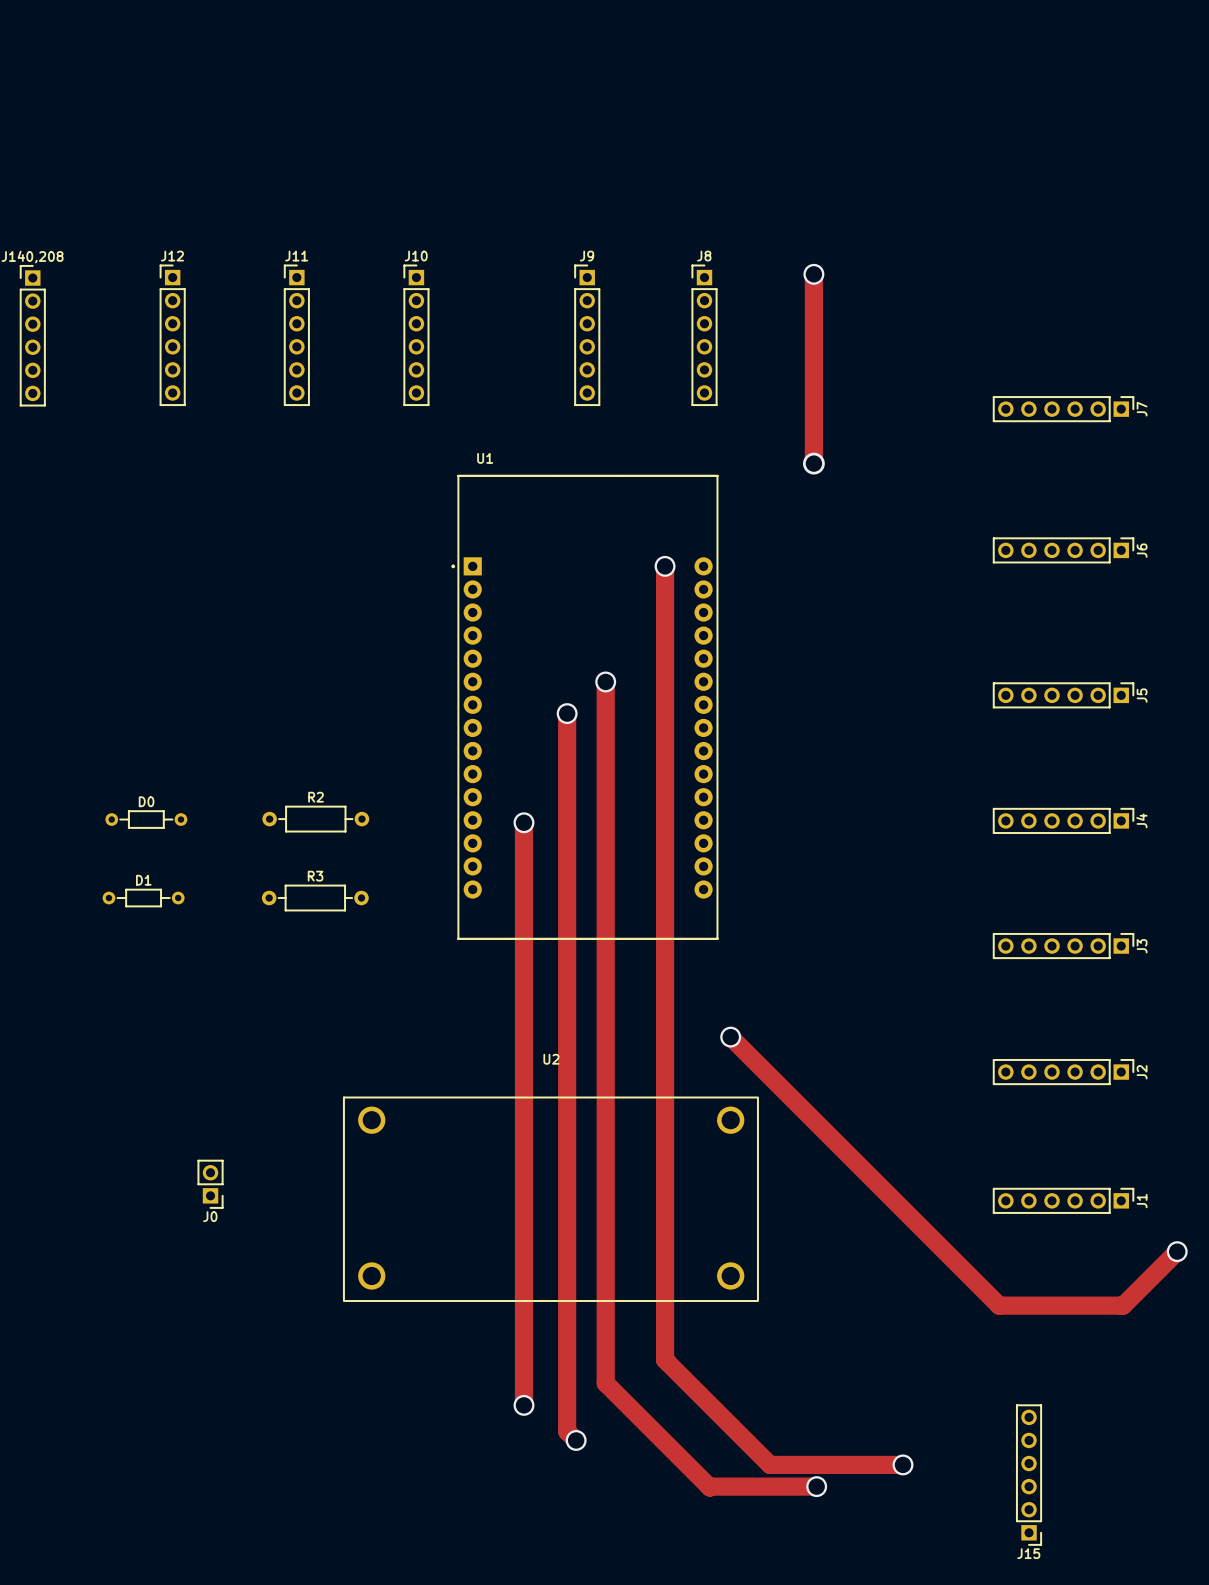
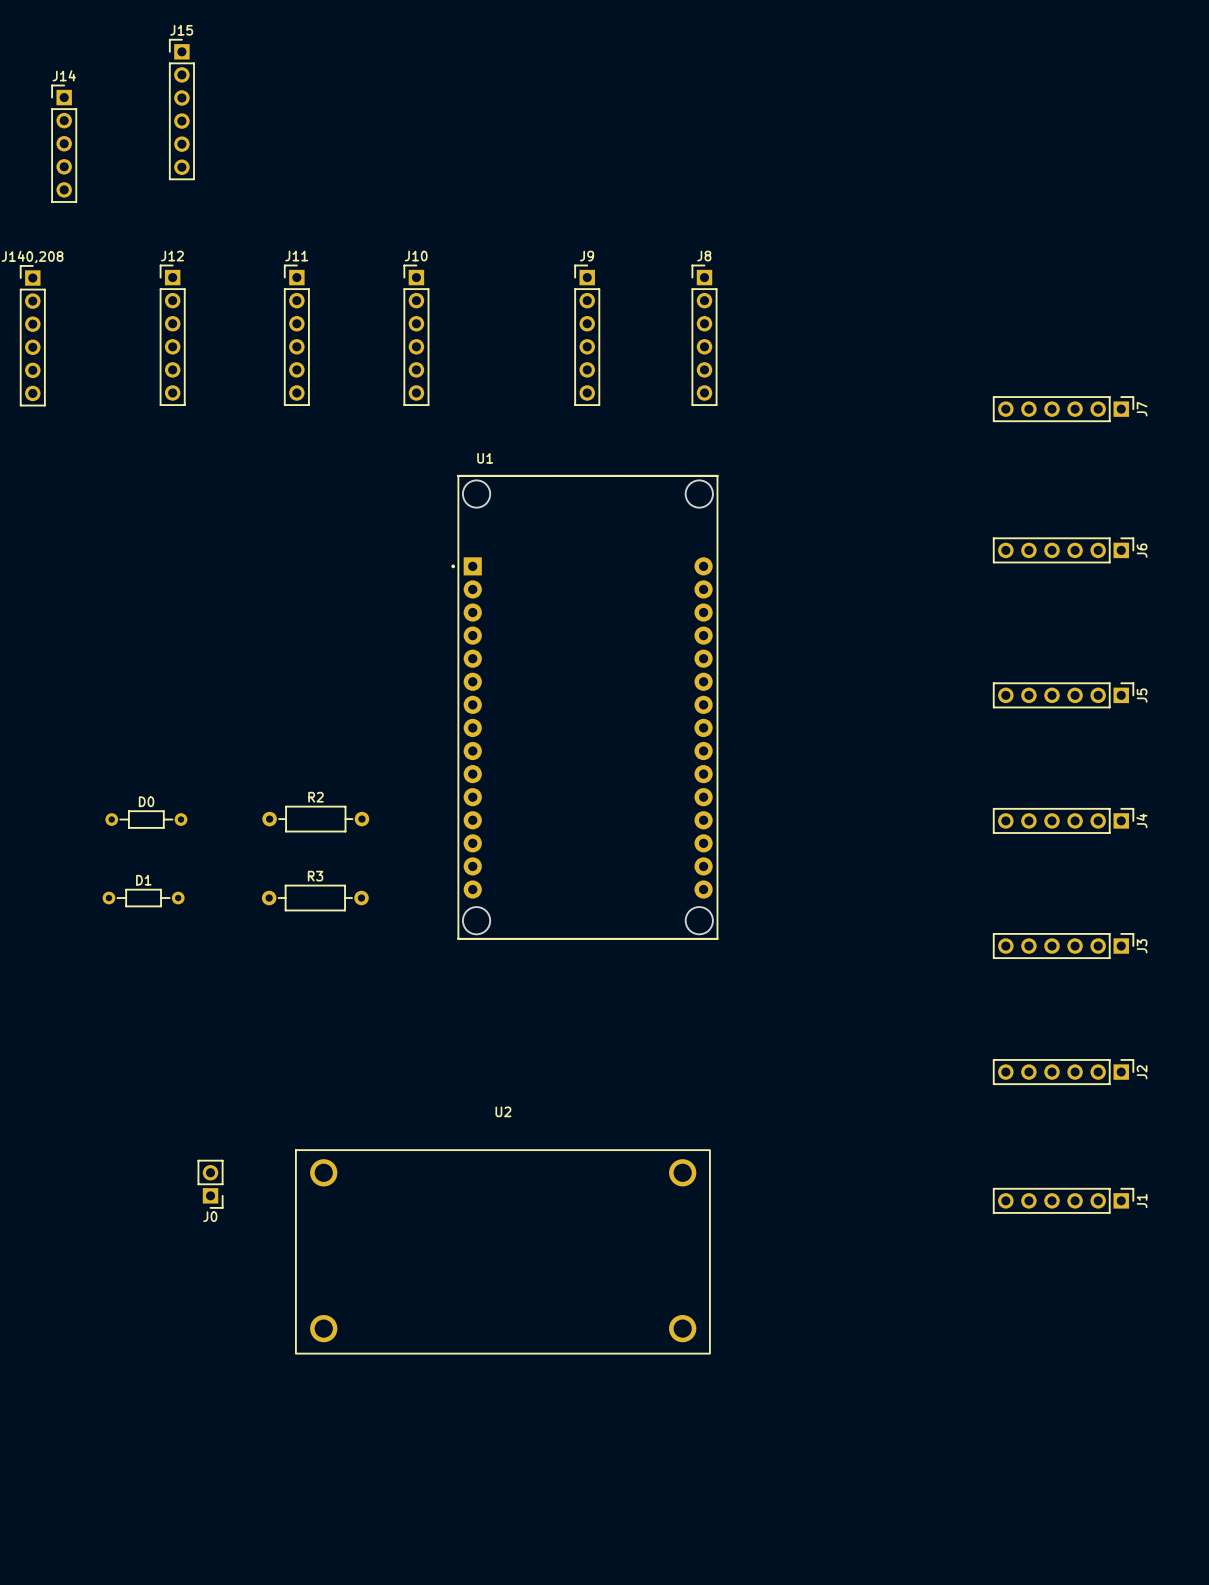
J14: none -> (64, 143)
track: (814, 273) (813, 463) -> none
via: (813, 274) -> none
via: (813, 463) -> none
U1 footprint: [451, 475, 719, 940] -> [451, 475, 719, 940]
track: (665, 566) (665, 1359) (770, 1464) (903, 1464) -> none
via: (665, 566) -> none
track: (605, 681) (605, 1383) (710, 1487) (817, 1486) -> none
via: (605, 681) -> none
track: (567, 713) (567, 1431) (576, 1440) -> none
via: (567, 713) -> none
track: (523, 822) (523, 1405) -> none
via: (523, 822) -> none
track: (730, 1037) (999, 1305) (1123, 1305) (1177, 1251) -> none
via: (730, 1037) -> none
U2 position: (550, 1199) -> (502, 1251)
via: (1177, 1251) -> none
via: (523, 1405) -> none
via: (576, 1440) -> none
via: (903, 1464) -> none
J15 rotation: 0° (1029, 1475) -> 180° (181, 109)
J15 position: (1029, 1475) -> (181, 109)
via: (816, 1486) -> none

